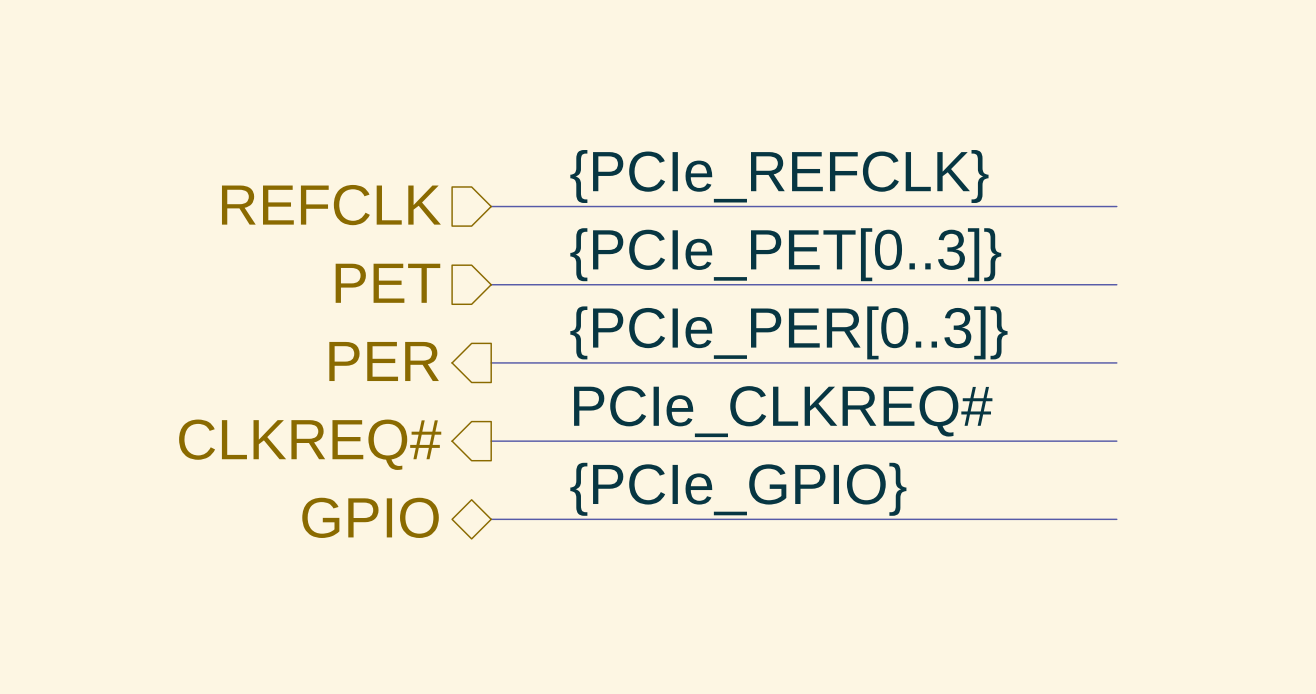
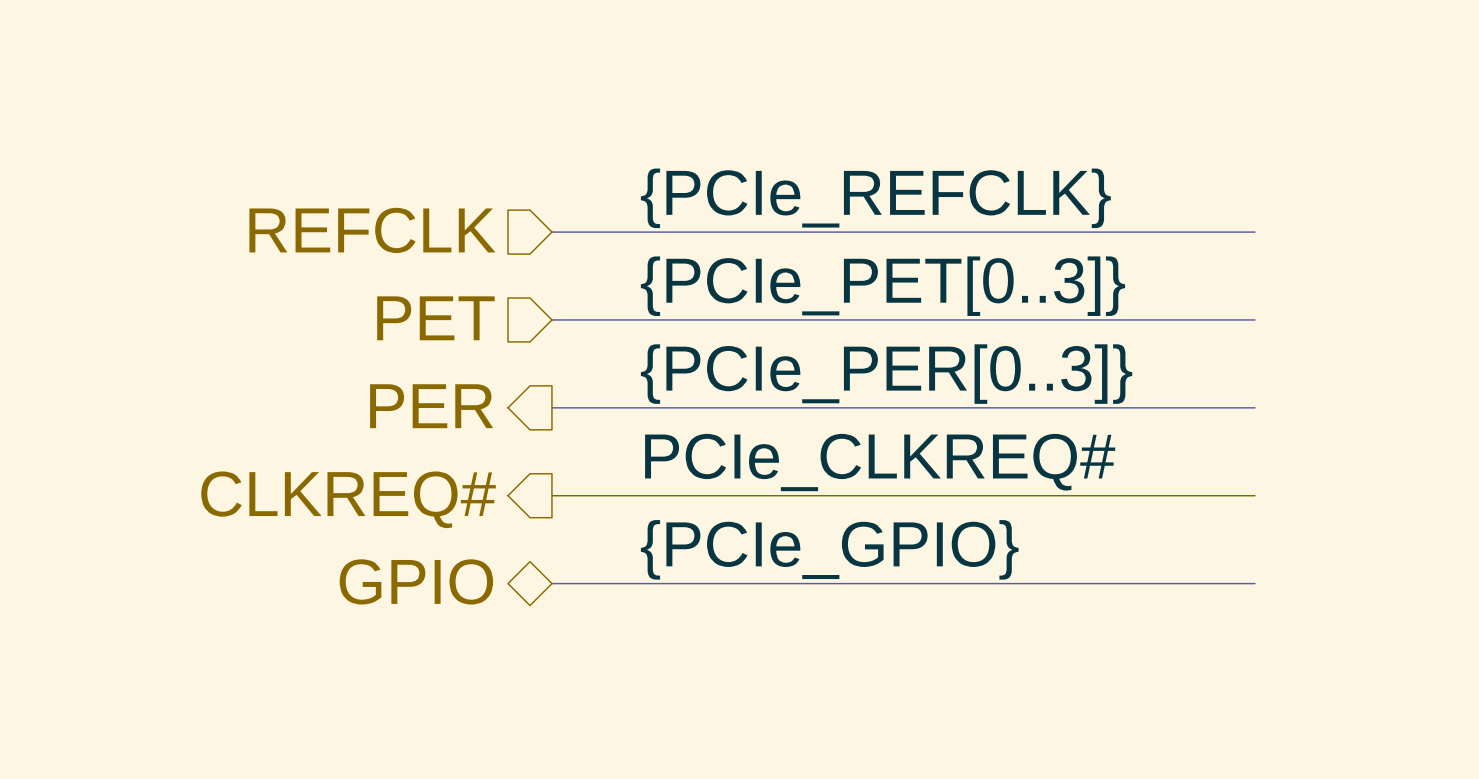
bus: (491, 441) (1116, 441) -> none

